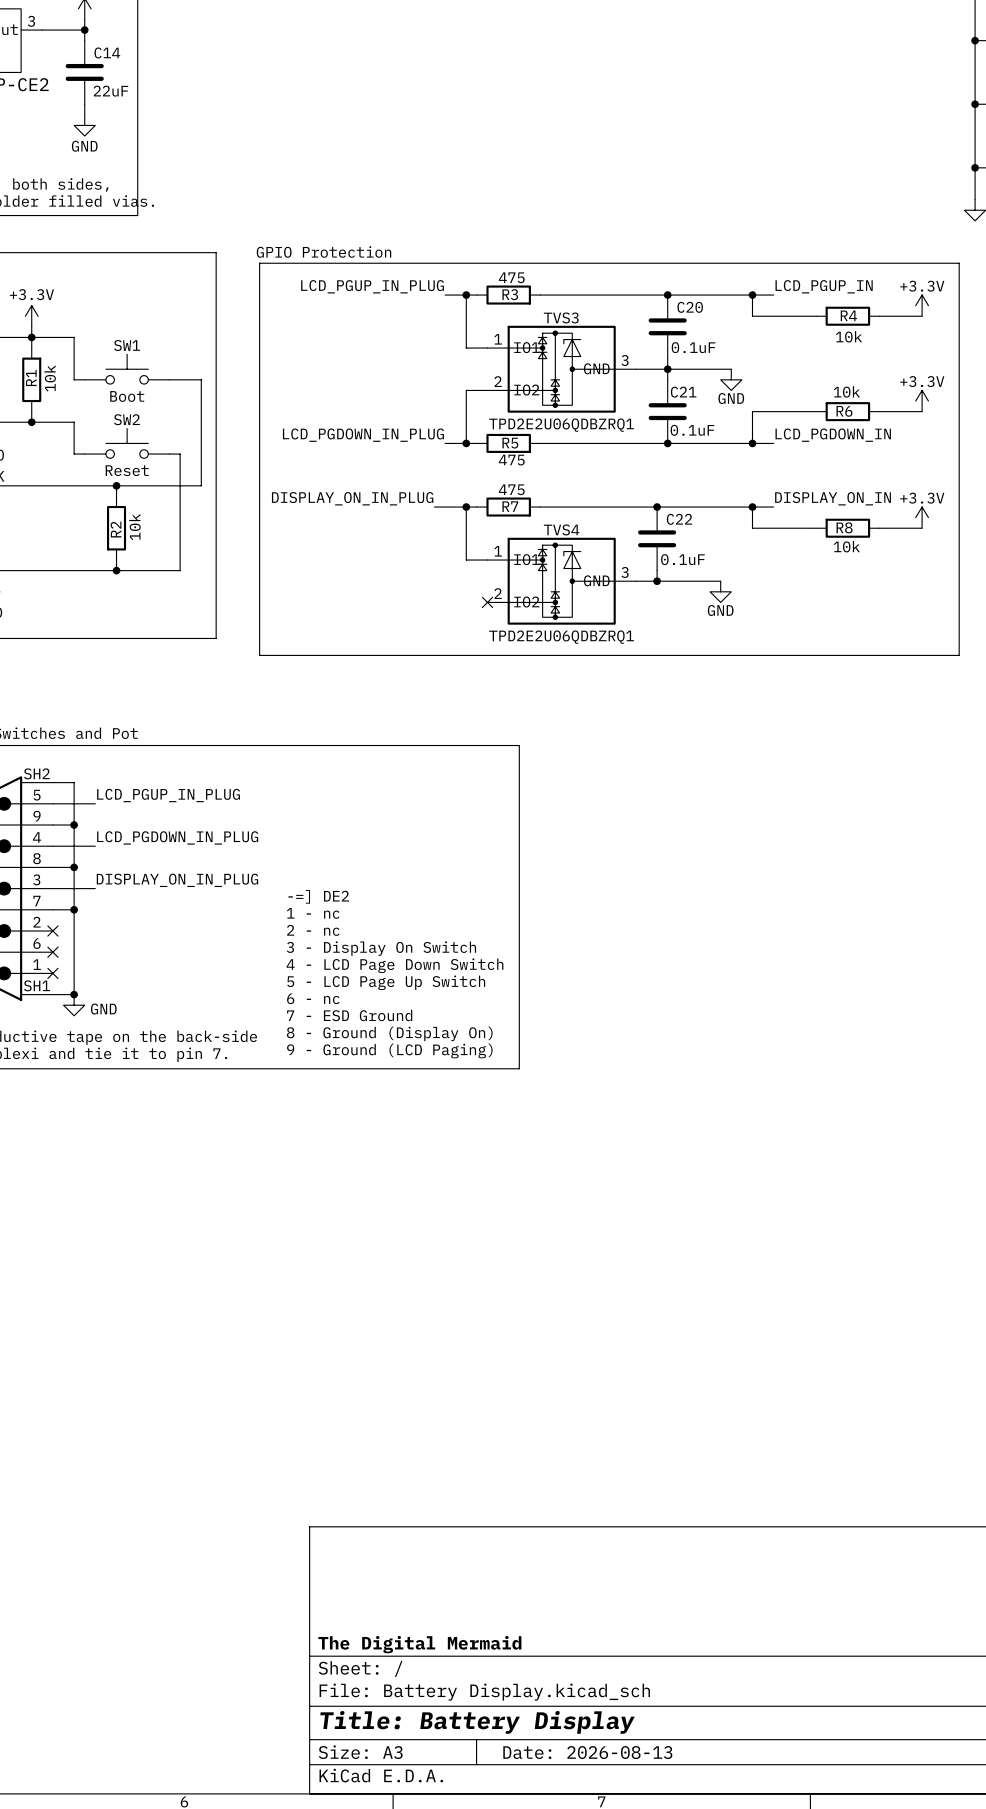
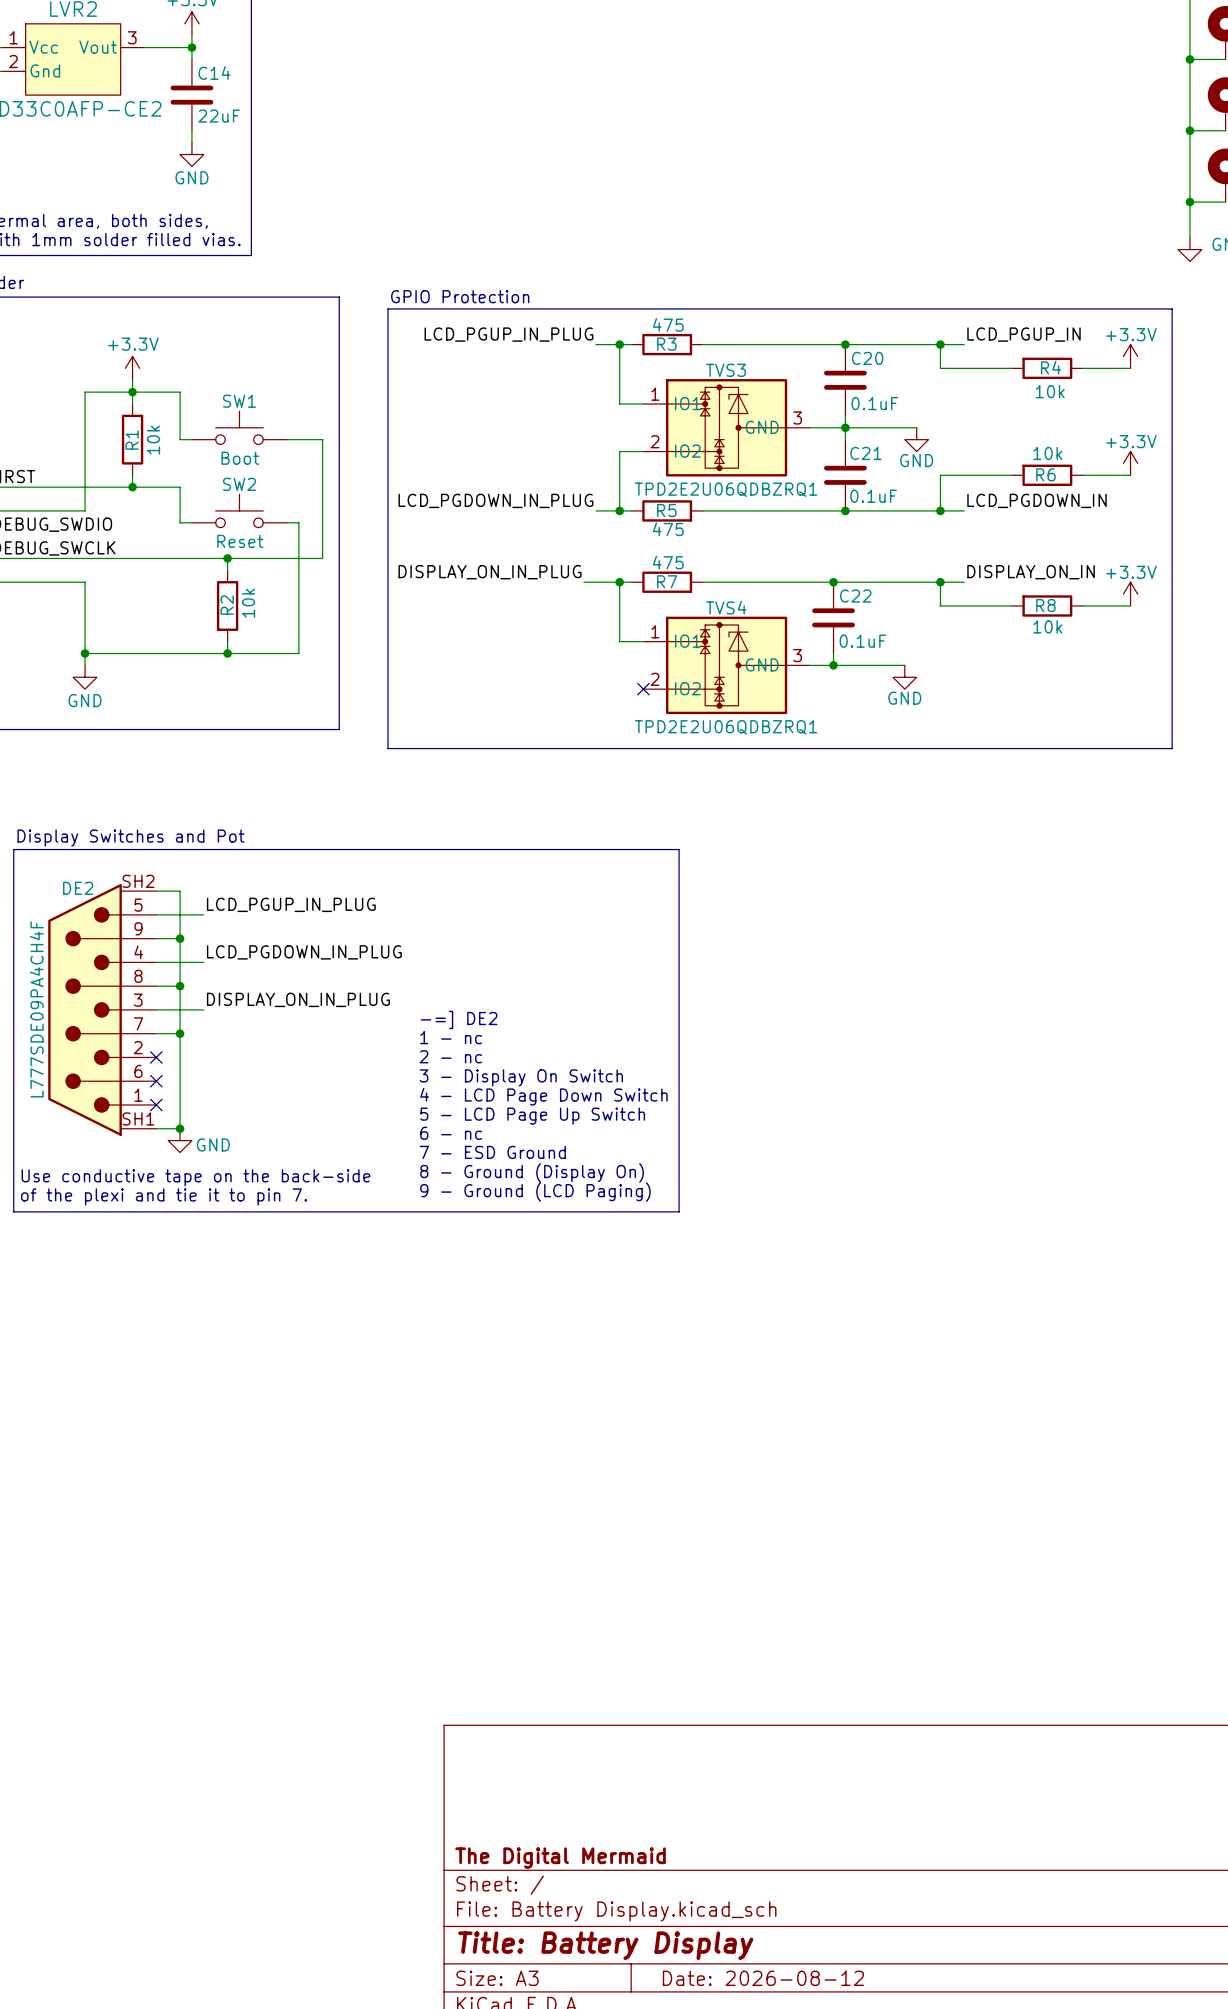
title block: Date: 2026-08-13 (587, 1752) -> Date: 2026-08-12 (763, 1978)

